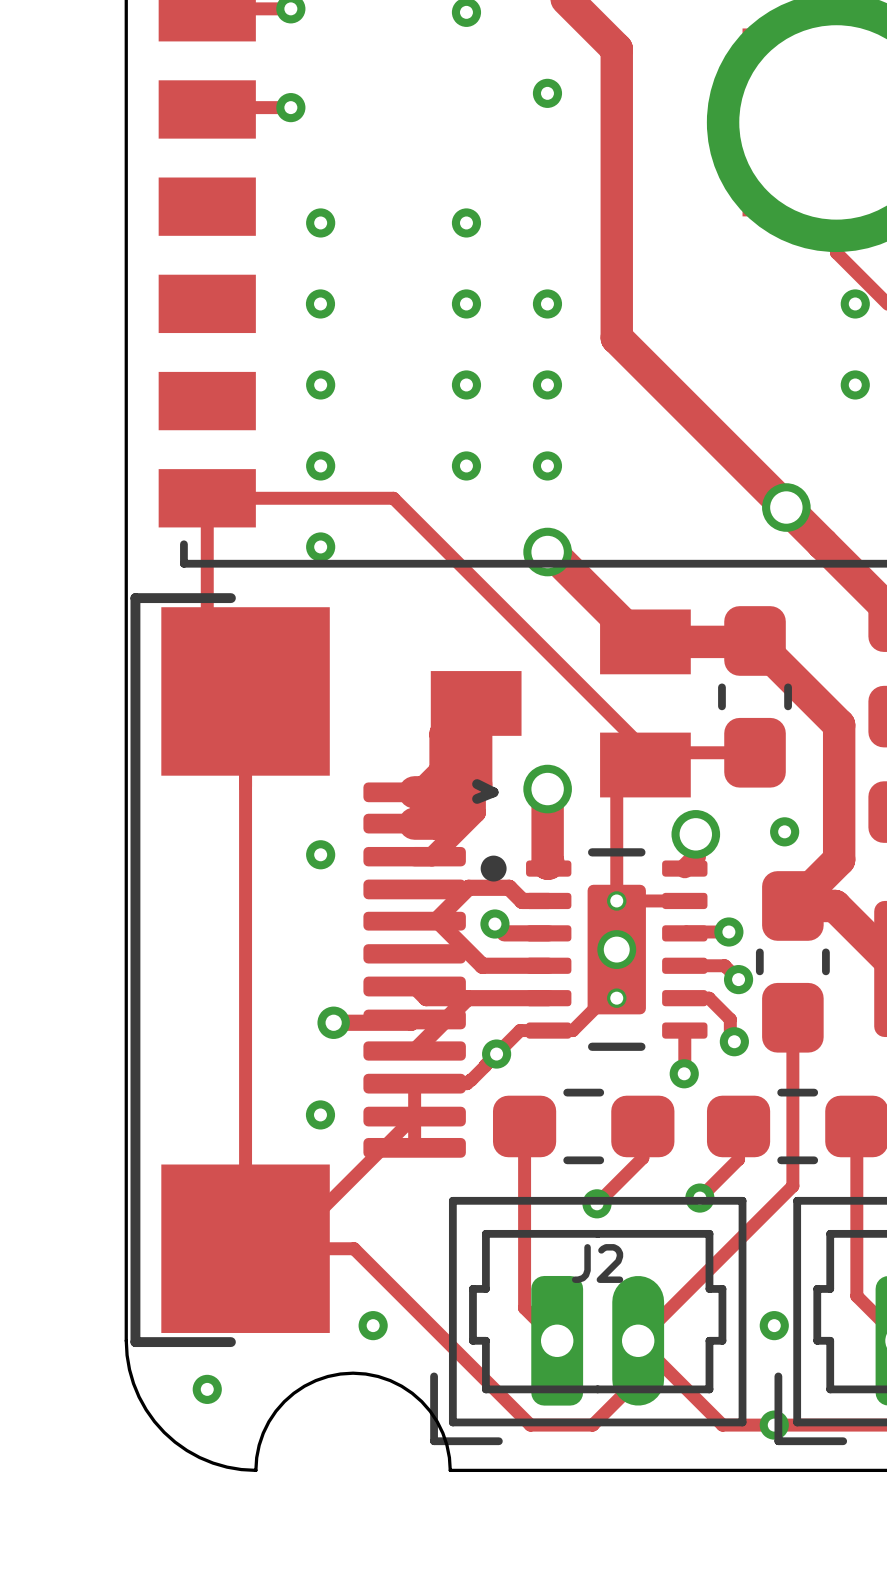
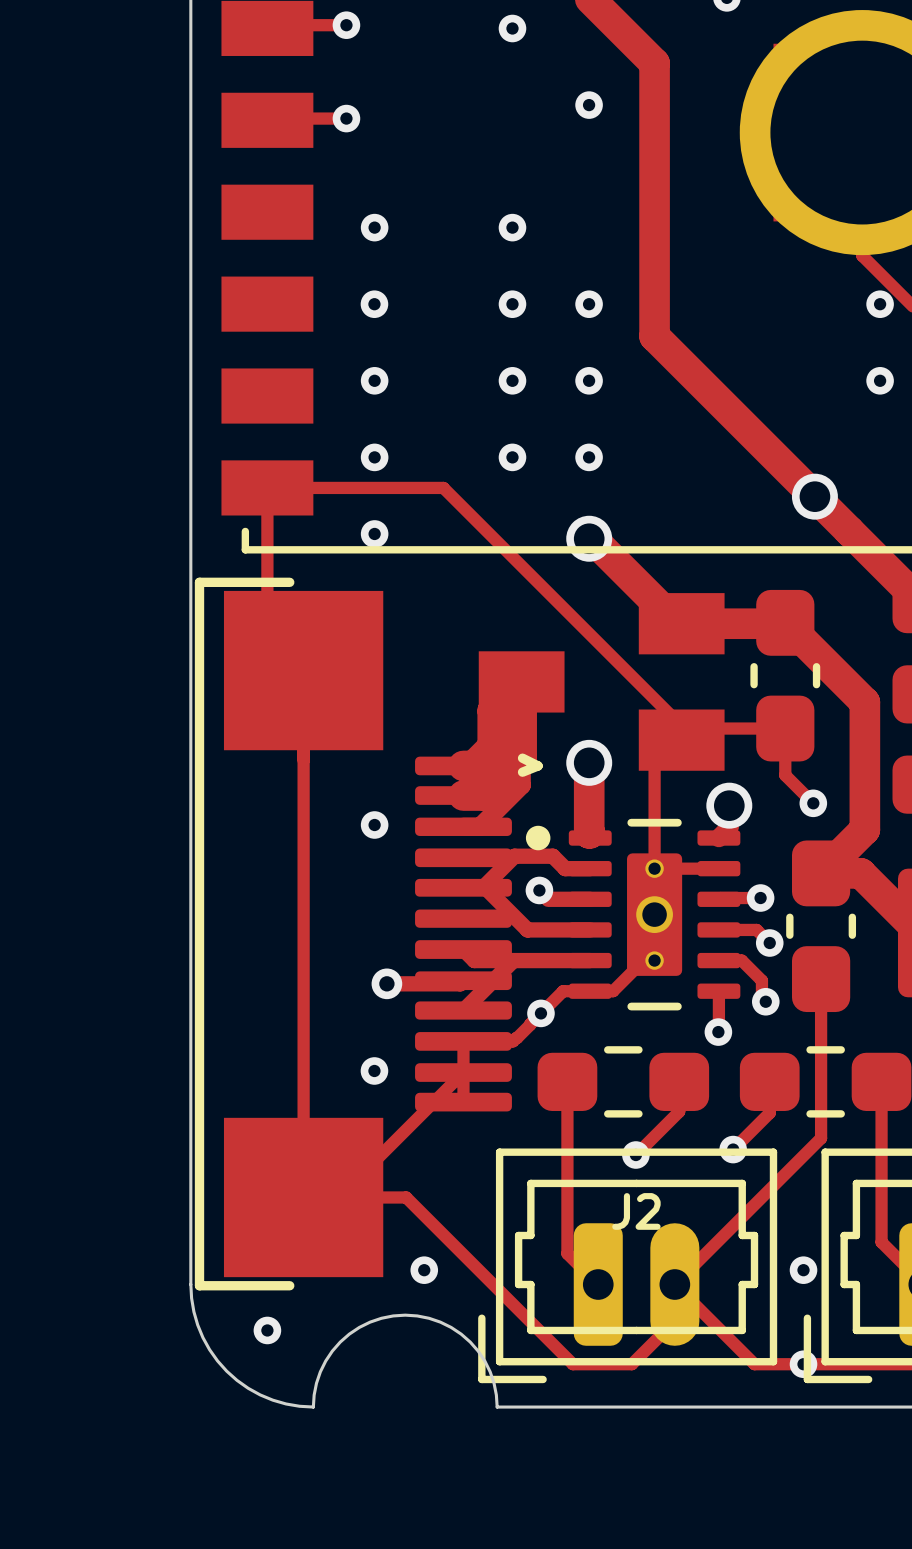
track: none -> (785, 728) (785, 775) (813, 803)

